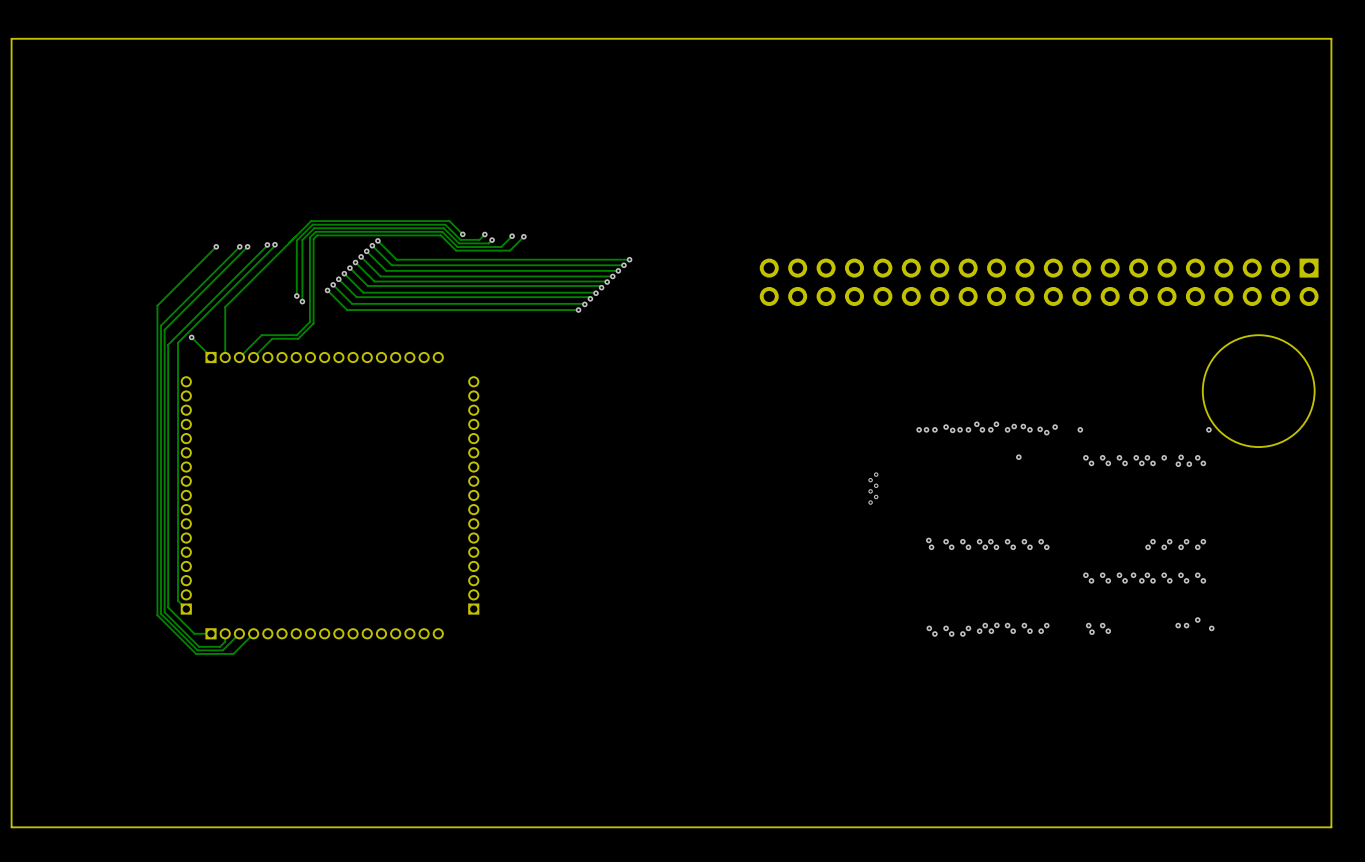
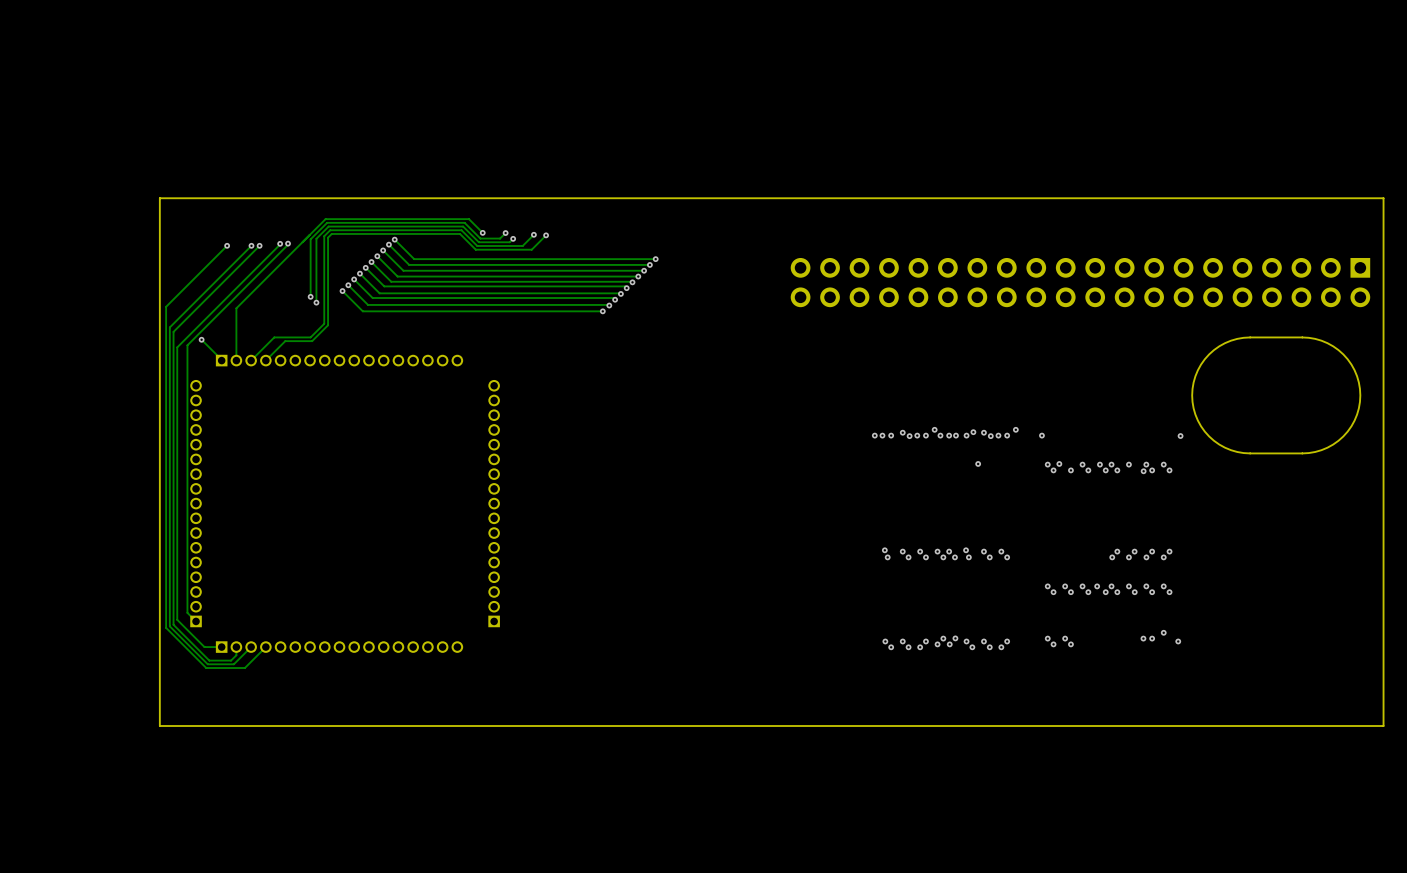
board edge: (1331, 200) (1331, 38) (11, 38) (11, 827) (1331, 827) (1331, 709) -> (1383, 198) (159, 198) (159, 726) (1383, 726)
round board edge: [1202, 334, 1315, 448] -> none
board edge: none -> (1302, 337) (1237, 338) (1224, 343) (1209, 354) (1197, 370) (1192, 395) (1197, 420) (1209, 436) (1224, 447) (1237, 451) (1302, 453) (1327, 447) (1343, 436) (1354, 420) (1358, 408) (1359, 388) (1354, 370) (1347, 359) (1333, 346) (1315, 338) (1302, 337)
via: none -> (934, 429)
via: (996, 424) -> none
via: none -> (973, 432)
via: (1014, 426) -> none
via: (1023, 426) -> none
via: none -> (902, 432)
via: (1055, 427) -> none
via: none -> (874, 435)
via: none -> (882, 435)
via: none -> (891, 435)
via: none -> (917, 435)
via: none -> (925, 435)
via: none -> (940, 435)
via: none -> (949, 435)
via: (926, 429) -> none
via: none -> (966, 435)
via: (934, 429) -> none
via: (982, 429) -> none
via: (990, 429) -> none
via: none -> (1041, 435)
via: (1007, 429) -> none
via: (1029, 429) -> none
via: (1040, 429) -> none
via: (1080, 429) -> none
via: (1208, 429) -> none
via: none -> (909, 436)
via: none -> (1180, 436)
via: (1046, 432) -> none
via: none -> (978, 463)
via: none -> (1047, 464)
via: none -> (1082, 464)
via: none -> (1099, 464)
via: none -> (1111, 464)
via: (1136, 457) -> none
via: (1147, 457) -> none
via: (1164, 457) -> none
via: (1181, 457) -> none
via: (1197, 457) -> none
via: none -> (1053, 470)
via: none -> (1070, 470)
via: none -> (1088, 470)
via: none -> (1105, 470)
via: none -> (1117, 470)
via: (1091, 463) -> none
via: (1141, 463) -> none
via: (1153, 463) -> none
via: (1203, 463) -> none
via: none -> (1143, 471)
via: (1178, 464) -> none
via: (1189, 464) -> none
via: (876, 474) -> none
via: (870, 480) -> none
via: (876, 485) -> none
via: (870, 491) -> none
via: (876, 496) -> none
via: (870, 502) -> none
via: none -> (884, 550)
via: none -> (902, 551)
via: none -> (920, 551)
via: none -> (937, 551)
via: none -> (949, 551)
via: (979, 541) -> none
via: (990, 541) -> none
via: (1007, 541) -> none
via: (1024, 541) -> none
via: (1041, 541) -> none
via: none -> (1117, 551)
via: none -> (1134, 551)
via: none -> (1152, 551)
via: none -> (1169, 551)
via: (1153, 541) -> none
via: (1169, 541) -> none
via: (1186, 541) -> none
via: (1203, 541) -> none
via: none -> (887, 557)
via: none -> (908, 557)
via: none -> (925, 557)
via: none -> (943, 557)
via: none -> (954, 557)
via: (985, 547) -> none
via: (996, 547) -> none
via: (1013, 547) -> none
via: (1029, 547) -> none
via: (1046, 547) -> none
via: none -> (1112, 557)
via: none -> (1128, 557)
via: none -> (1146, 557)
via: none -> (1163, 557)
via: (1148, 547) -> none
via: (1164, 547) -> none
via: (1181, 547) -> none
via: (1197, 547) -> none
via: none -> (1047, 586)
via: none -> (1065, 586)
via: none -> (1082, 586)
via: none -> (1097, 586)
via: none -> (1111, 586)
via: (1133, 575) -> none
via: (1147, 575) -> none
via: (1164, 575) -> none
via: (1180, 575) -> none
via: (1197, 575) -> none
via: none -> (1053, 592)
via: none -> (1070, 592)
via: none -> (1088, 592)
via: none -> (1105, 592)
via: none -> (1117, 592)
via: (1141, 580) -> none
via: (1153, 580) -> none
via: (1169, 580) -> none
via: (1186, 580) -> none
via: (1203, 580) -> none
via: none -> (1163, 632)
via: (1197, 620) -> none
via: none -> (943, 638)
via: none -> (955, 638)
via: (985, 625) -> none
via: (996, 625) -> none
via: (1046, 625) -> none
via: (1088, 625) -> none
via: none -> (1143, 638)
via: (1102, 625) -> none
via: none -> (1152, 638)
via: (1178, 625) -> none
via: (1186, 625) -> none
via: none -> (885, 641)
via: none -> (902, 641)
via: none -> (925, 641)
via: none -> (1178, 641)
via: (1211, 628) -> none
via: none -> (937, 644)
via: none -> (949, 644)
via: (979, 631) -> none
via: (991, 631) -> none
via: (1041, 631) -> none
via: (1108, 631) -> none
via: (1092, 632) -> none
via: none -> (891, 647)
via: none -> (908, 647)
via: none -> (920, 647)

